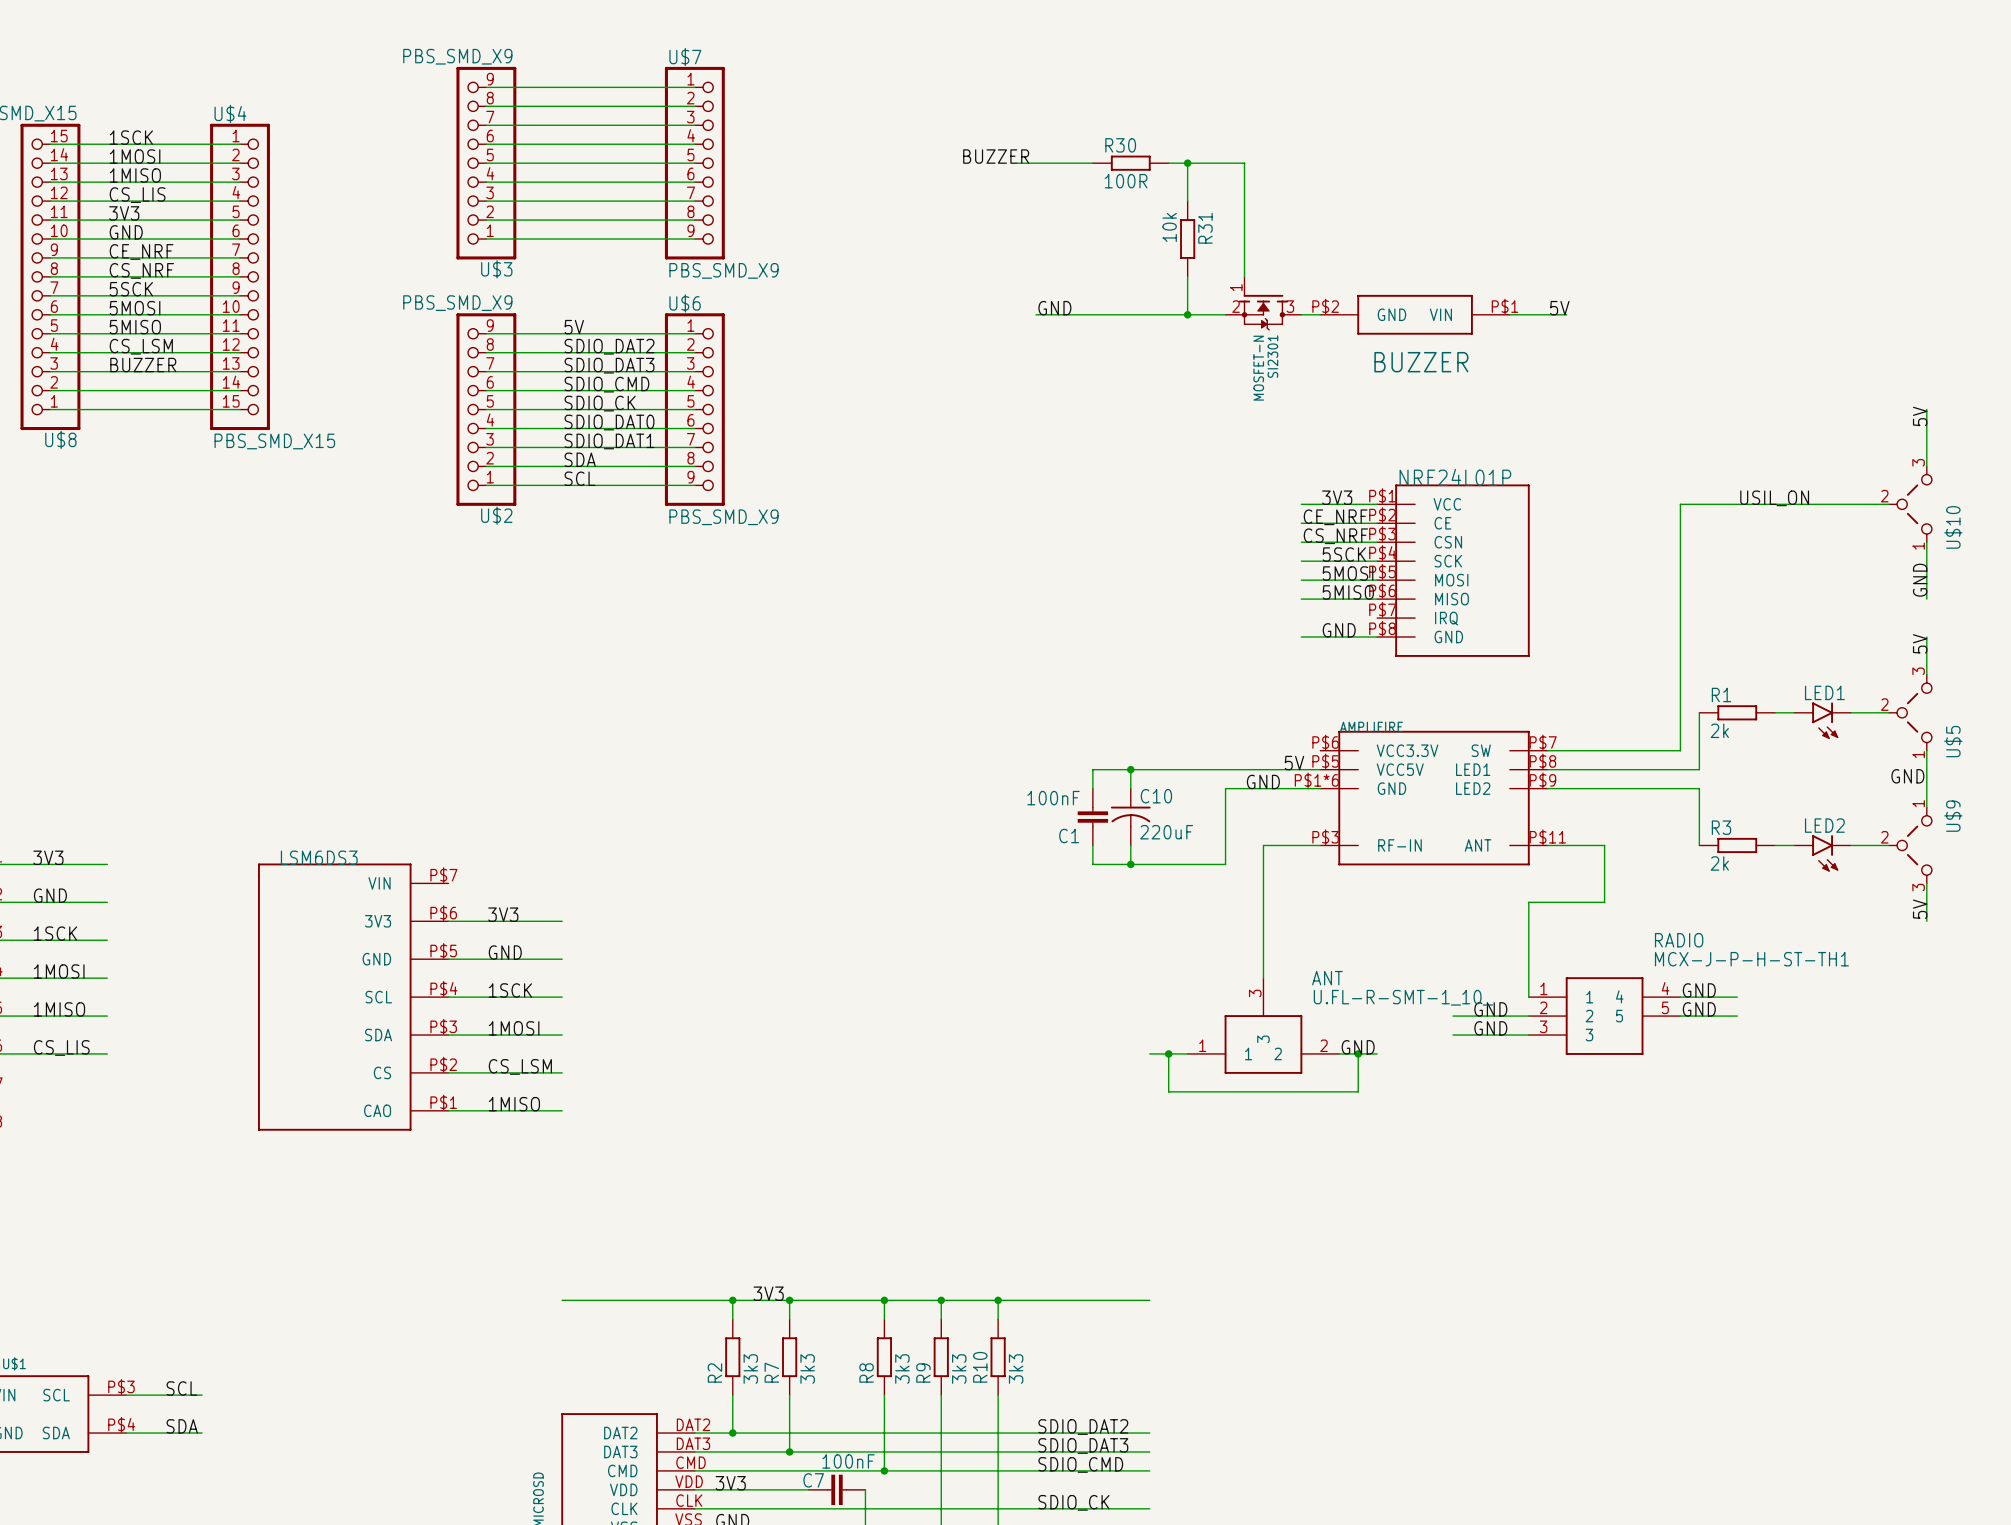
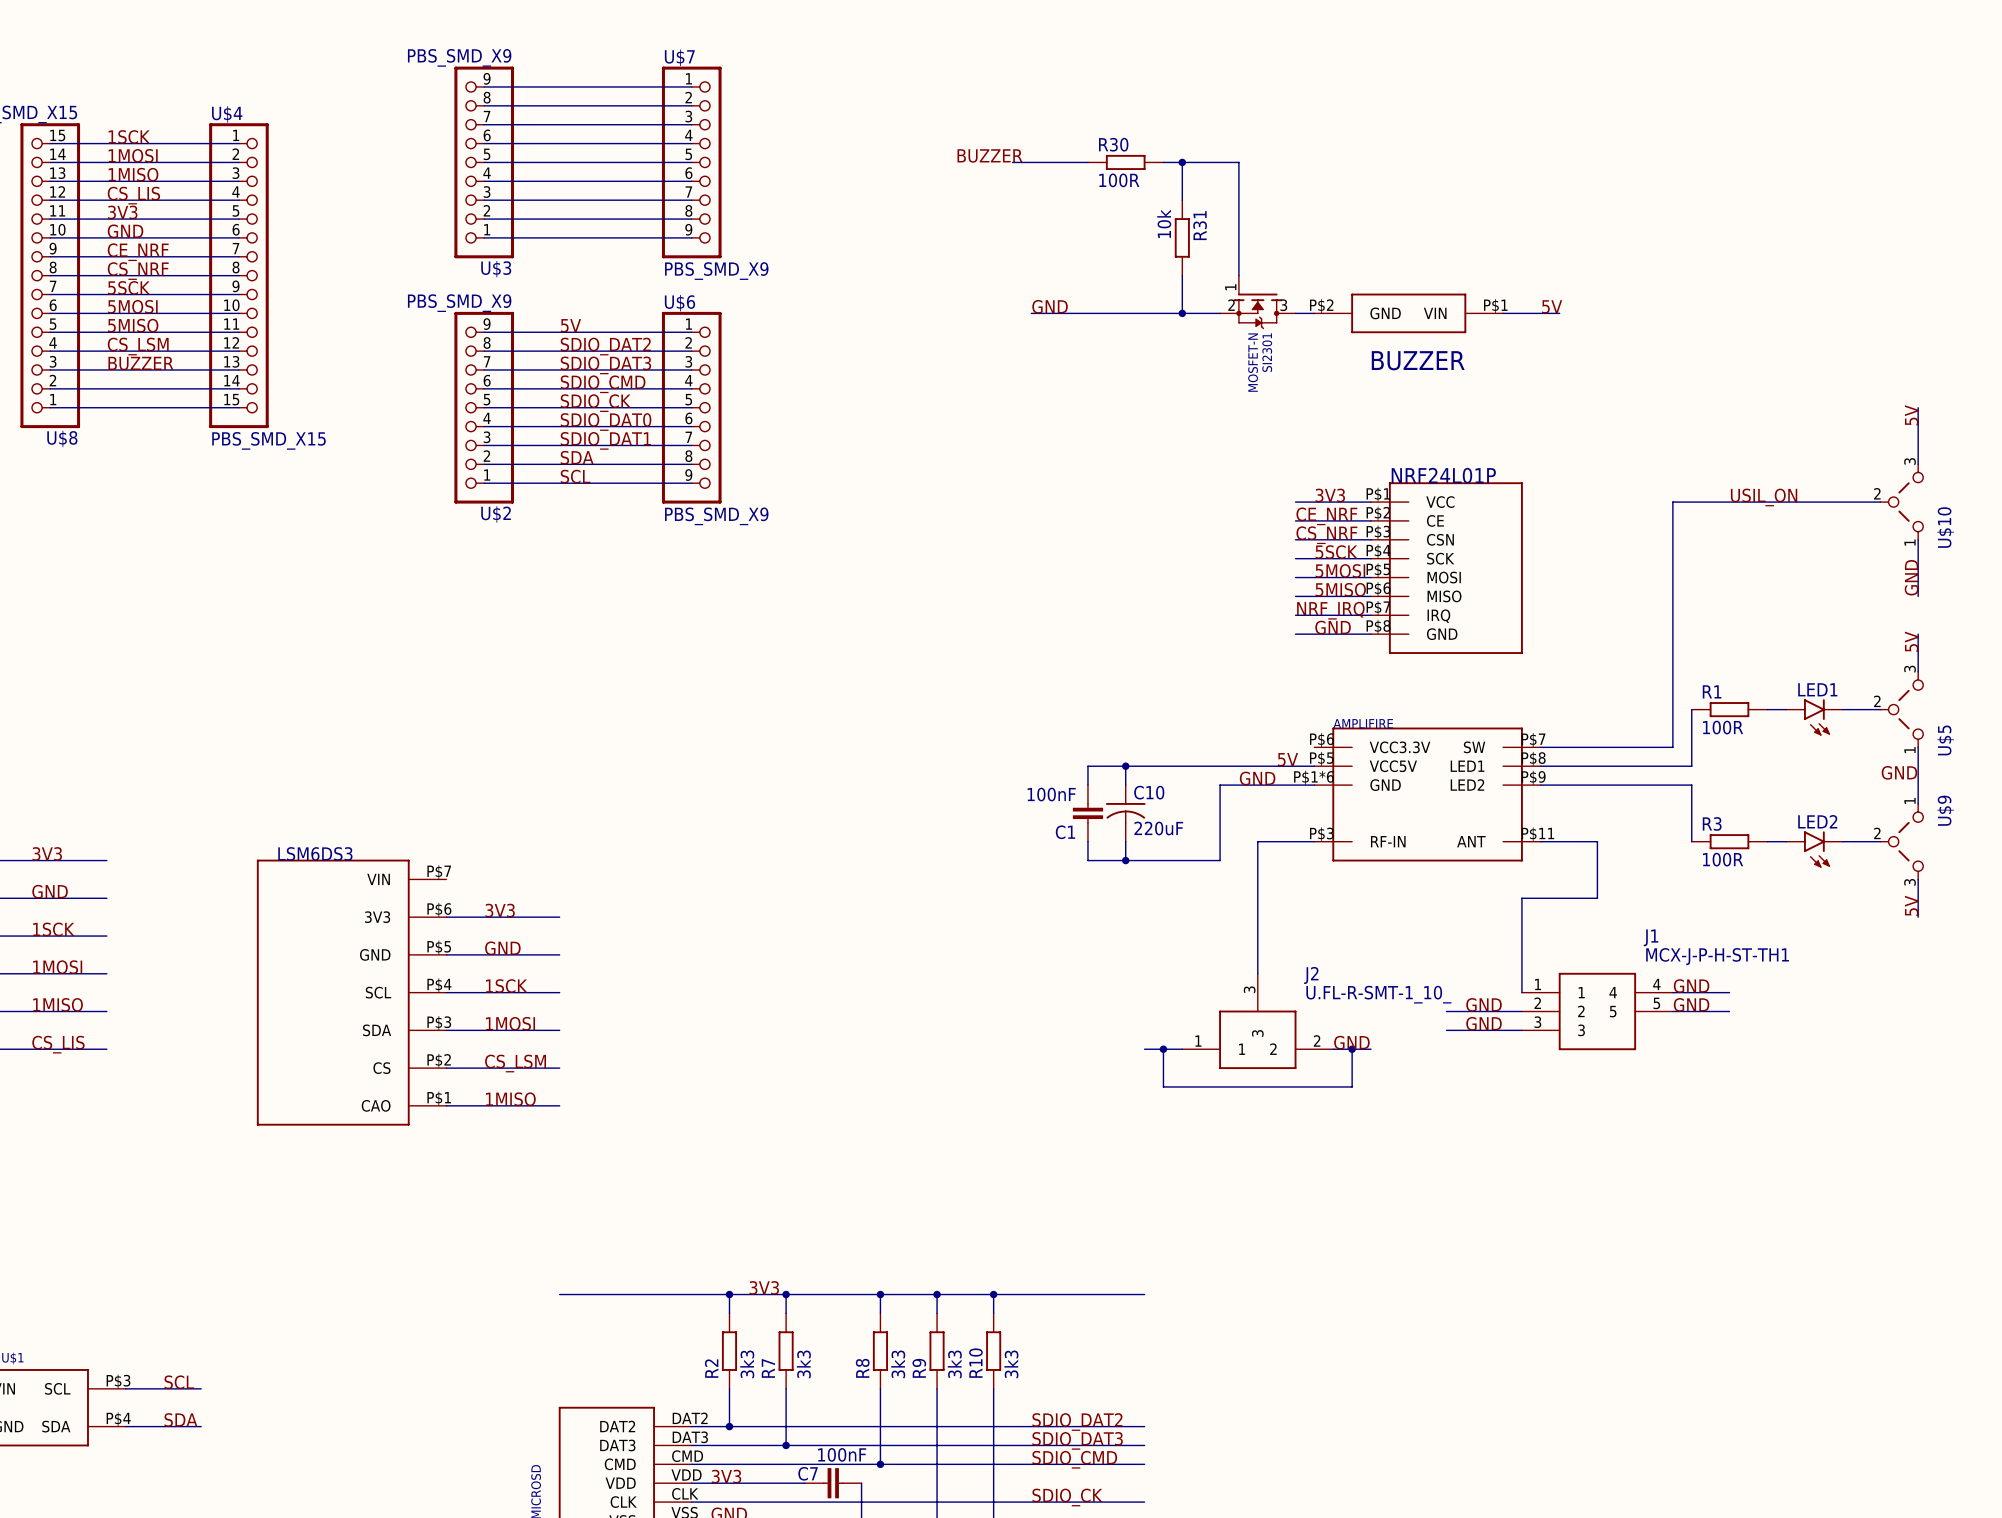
label: none -> NRF_IRQ (1330, 610)
wire: none -> (1295, 615) (1371, 615)
R1 value: 2k (1719, 730) -> 100R (1723, 727)
R3 value: 2k (1719, 863) -> 100R (1723, 859)
RADIO name: RADIO (1679, 940) -> J1 (1651, 937)
ANT name: ANT (1327, 978) -> J2 (1311, 975)

